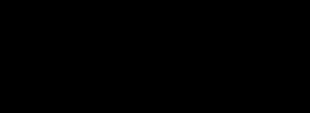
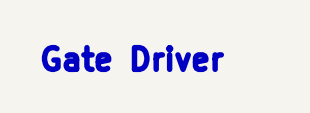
text: none -> Gate Driver (132, 58)

